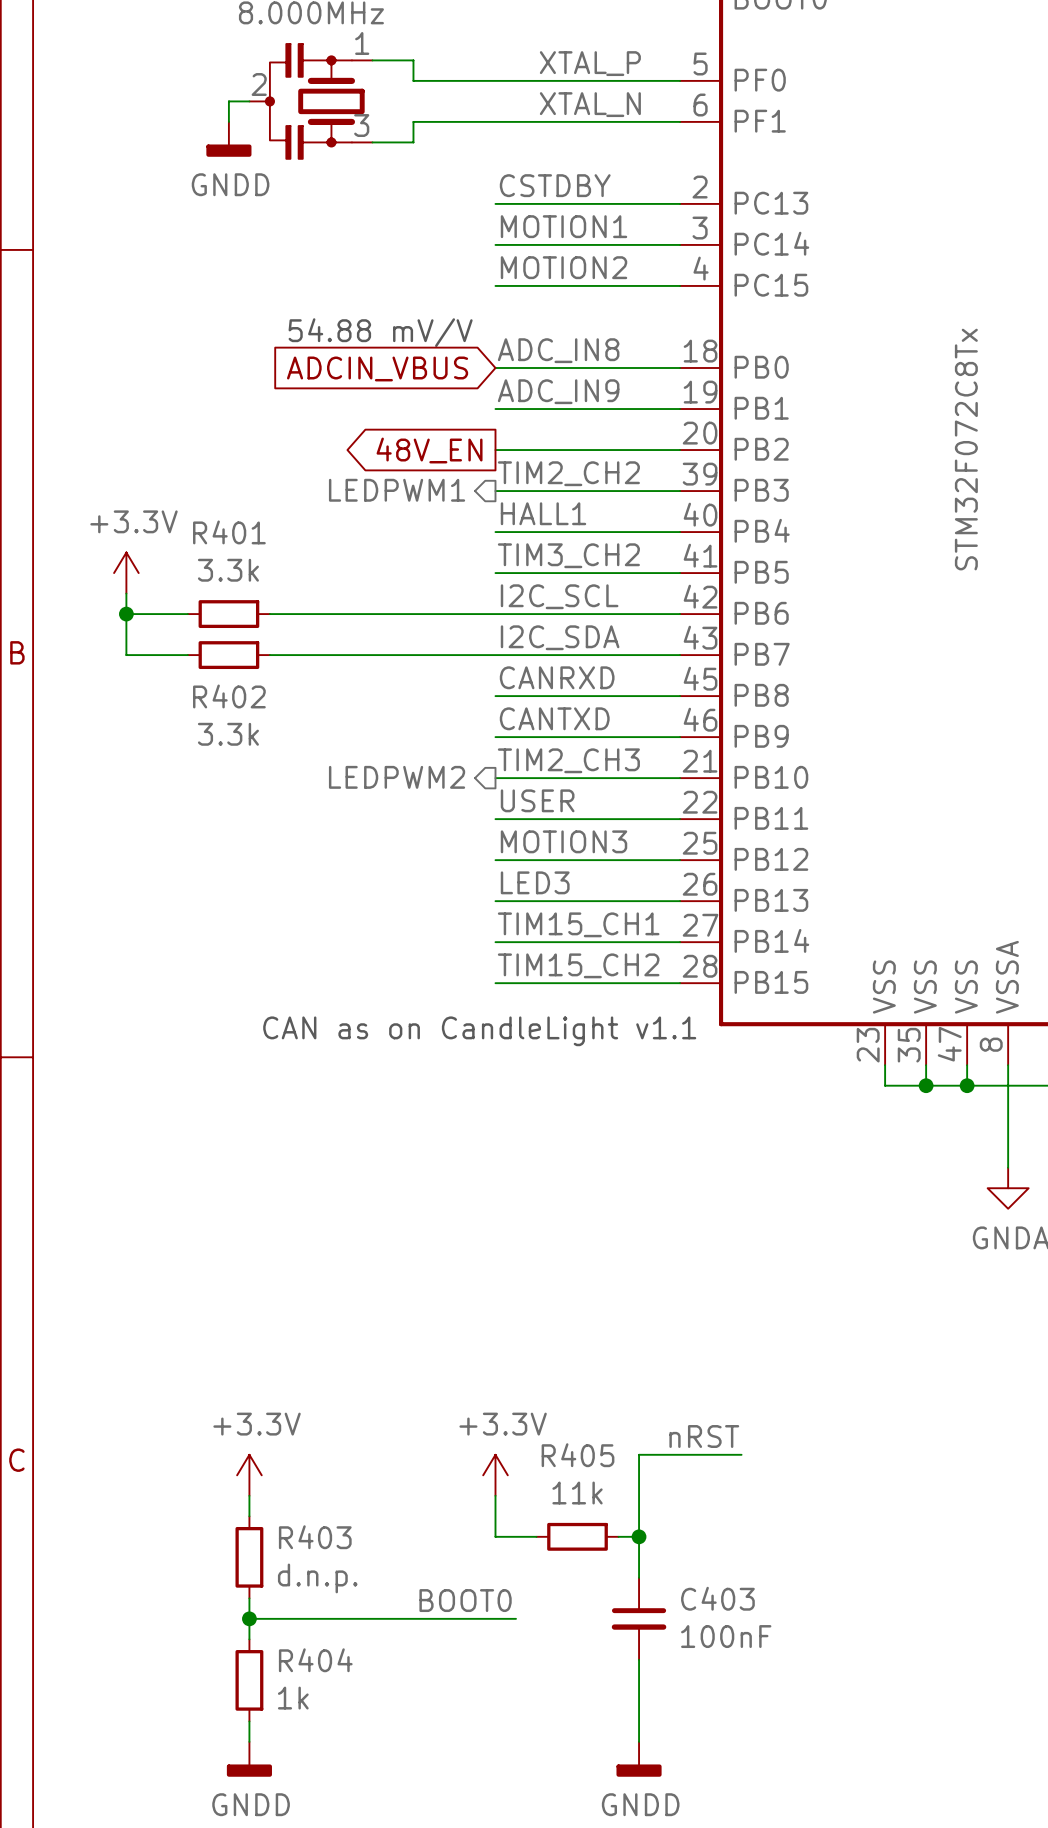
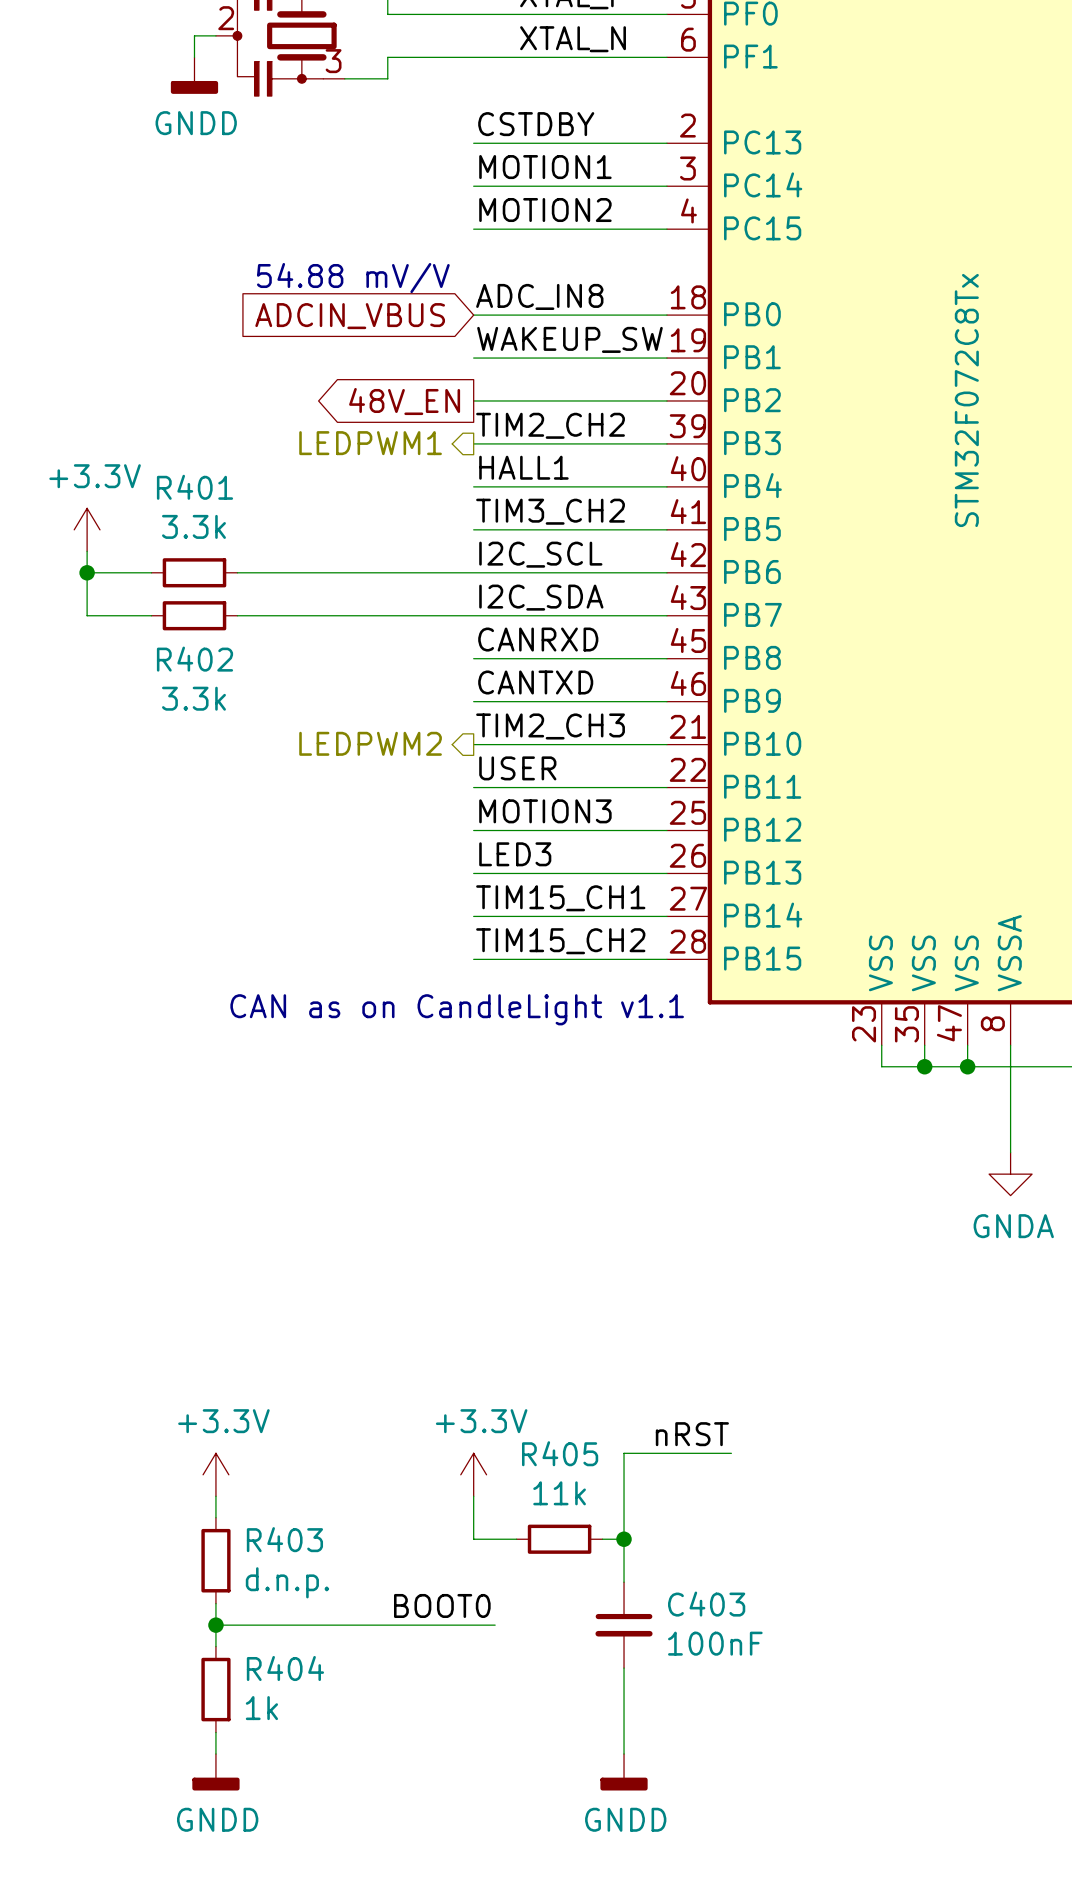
label: ADC_IN9 (558, 391) -> WAKEUP_SW (569, 339)

